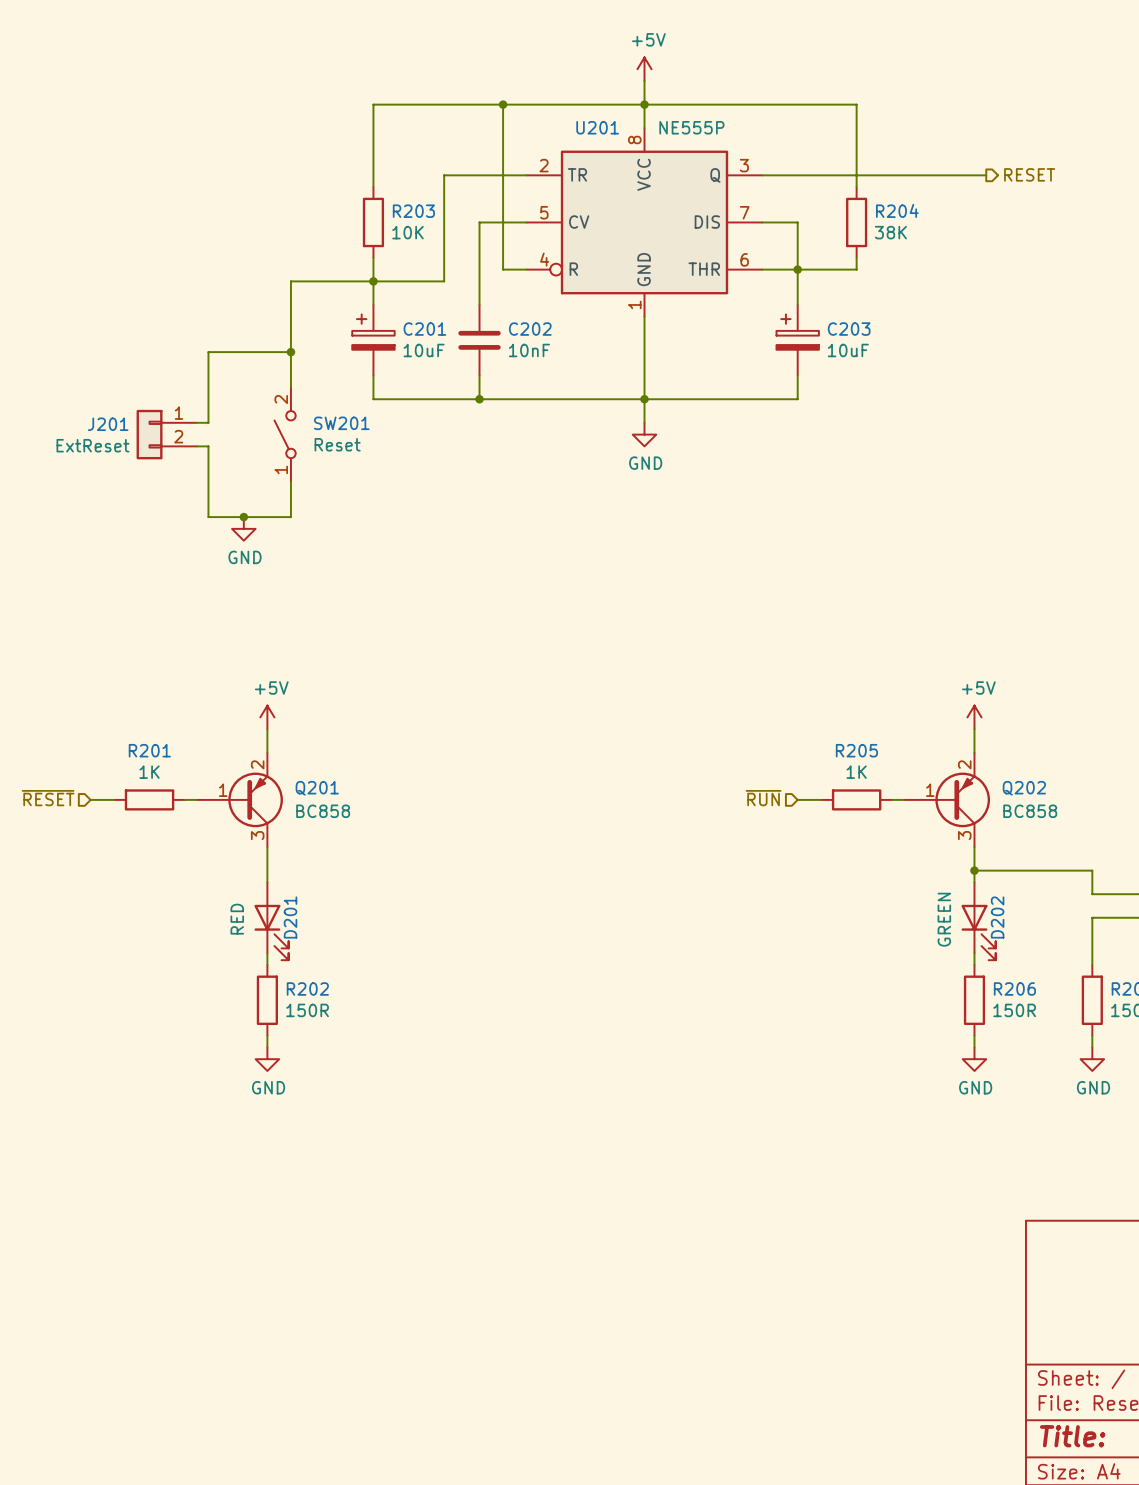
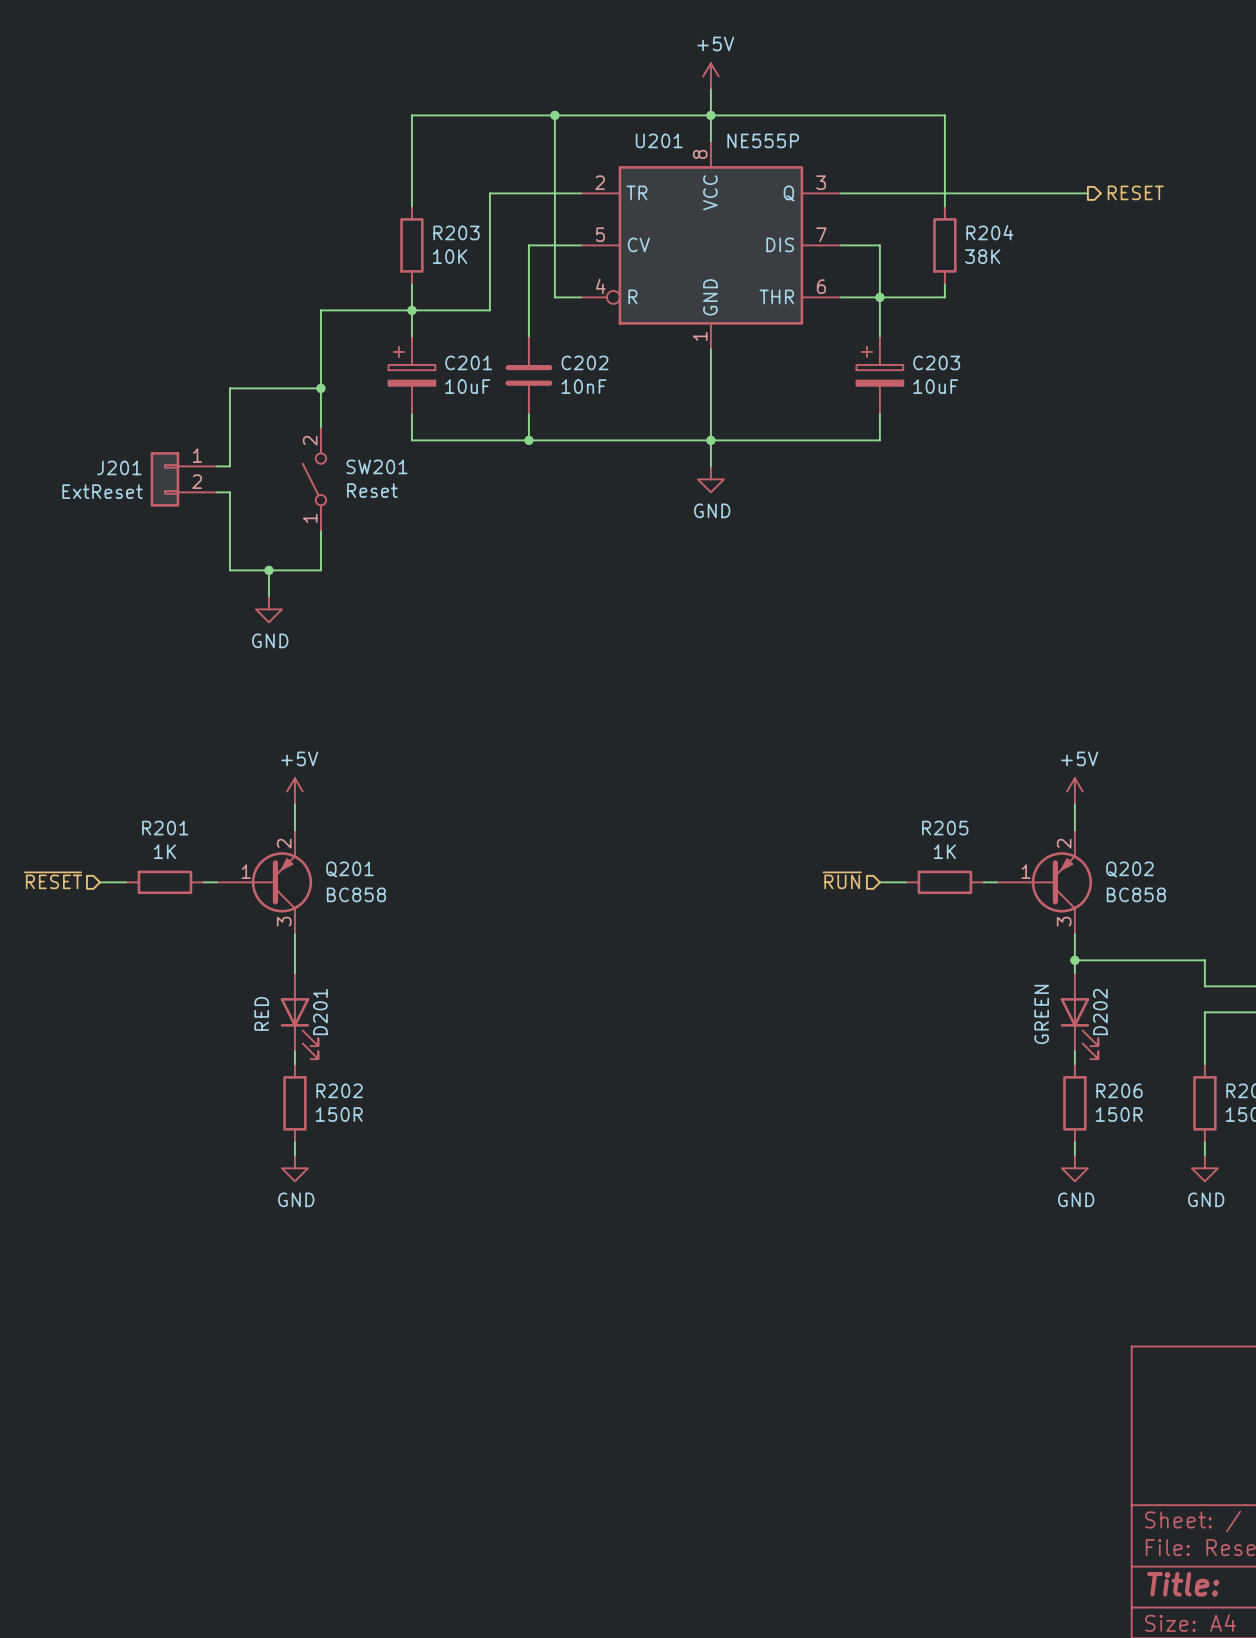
power symbol position: GND (243, 528) -> GND (268, 609)

